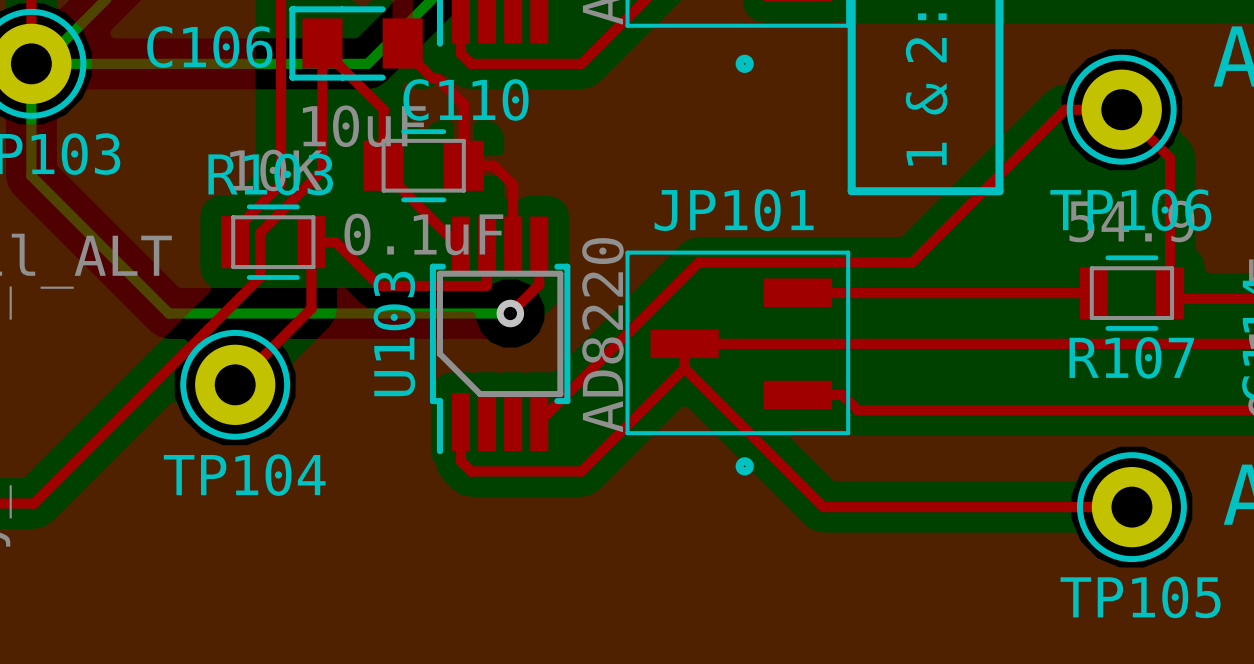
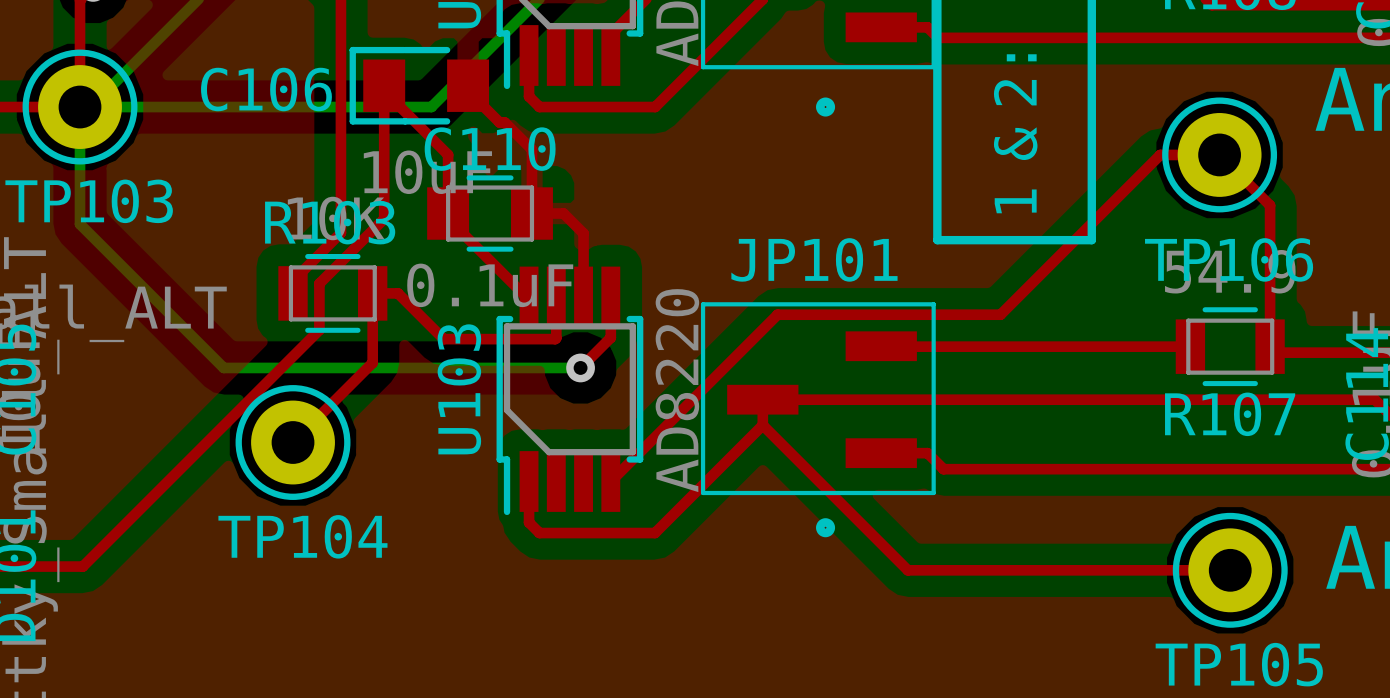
C110 name position: C110 (466, 99) -> C110 (490, 149)

